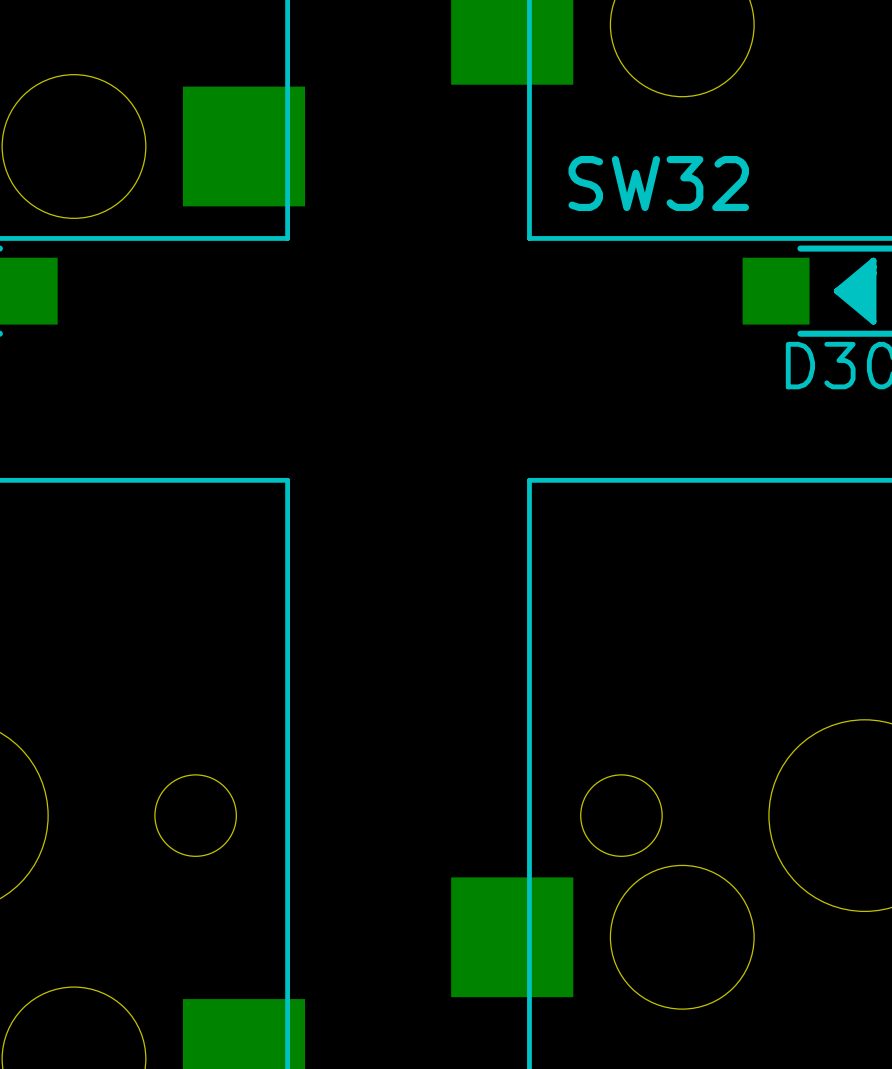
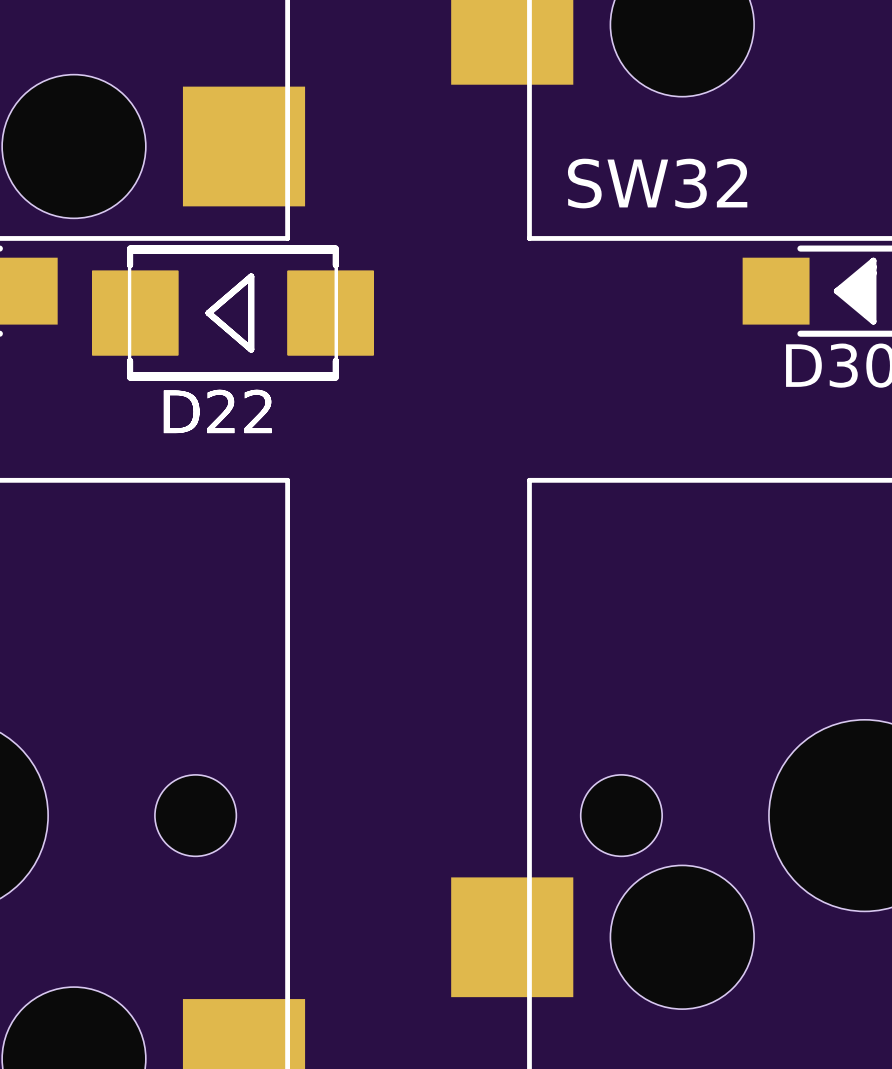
D22: none -> (232, 313)
D22: none -> (232, 313)

